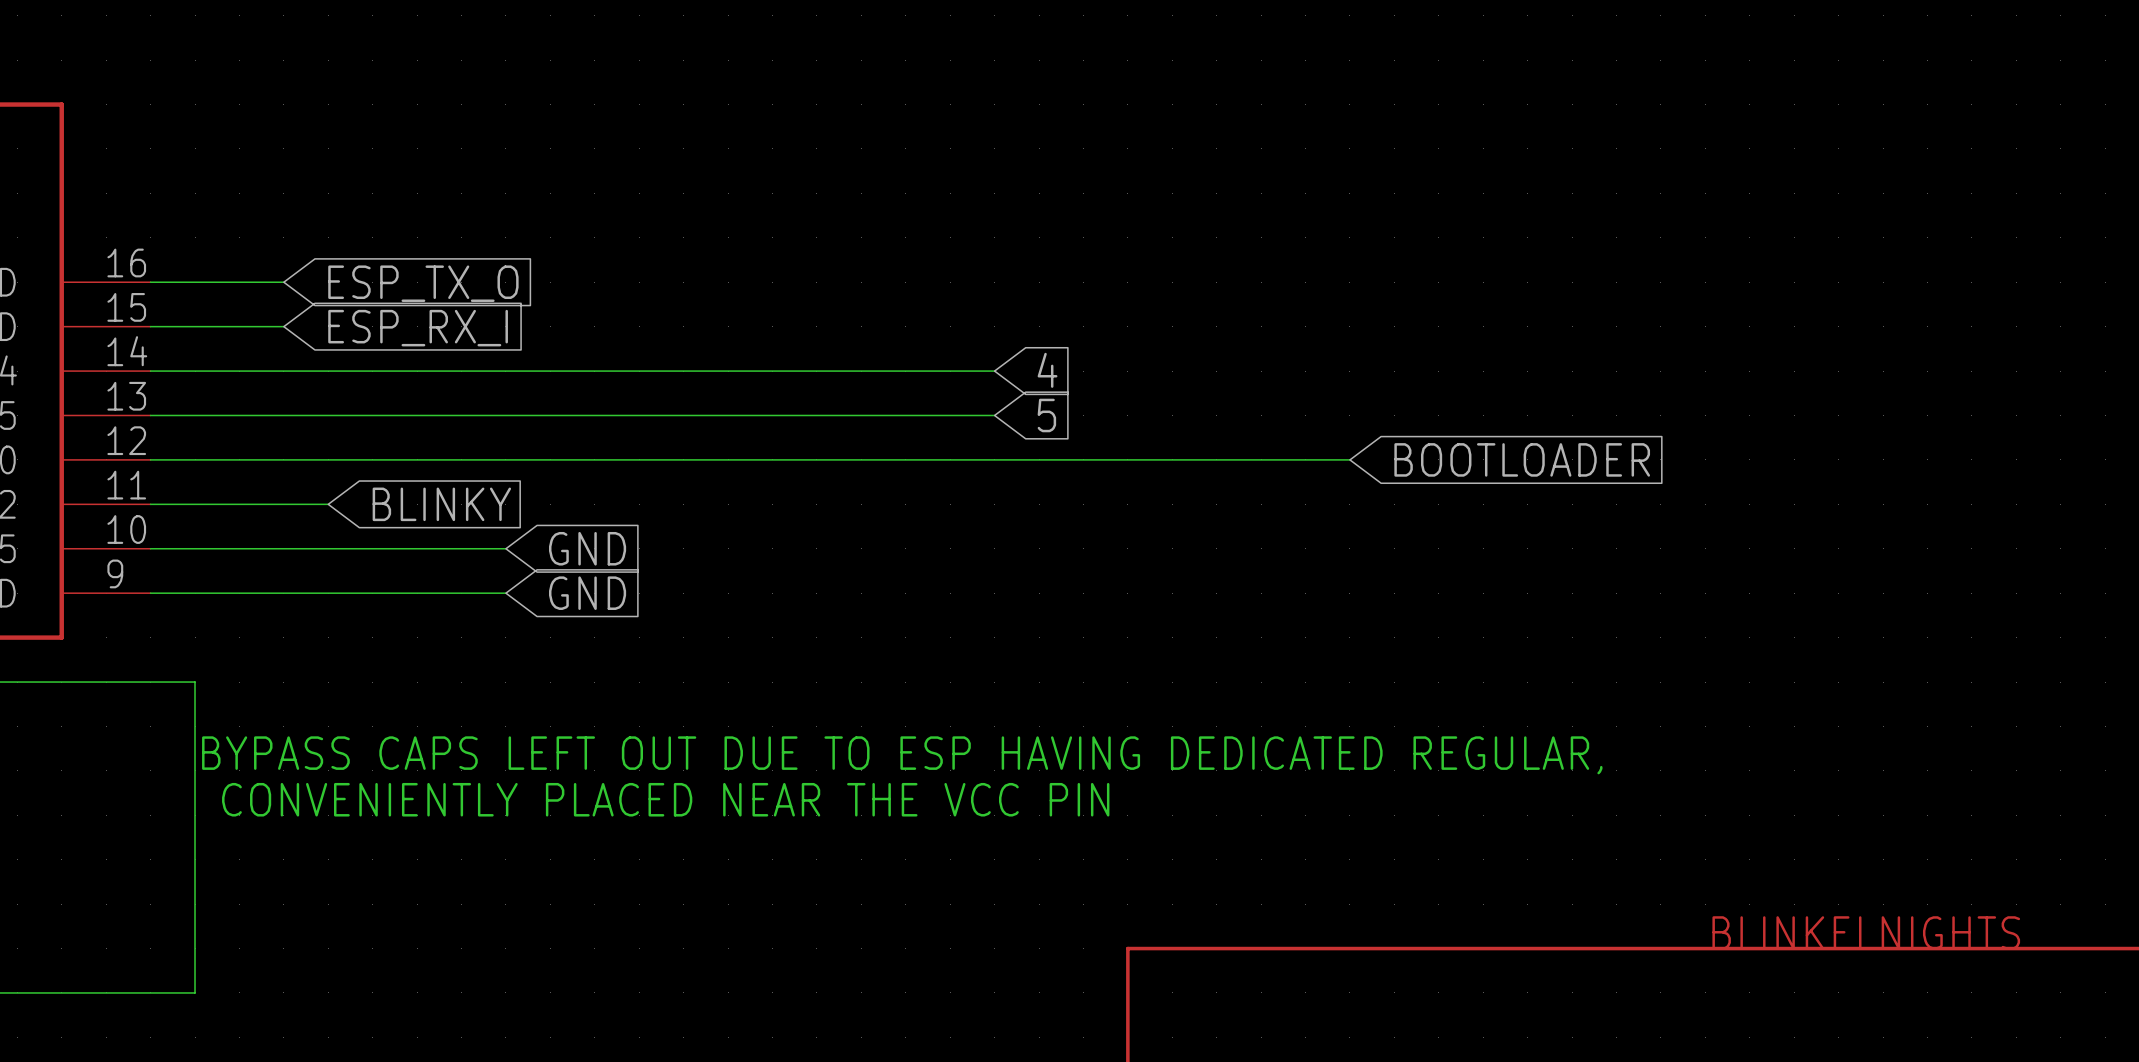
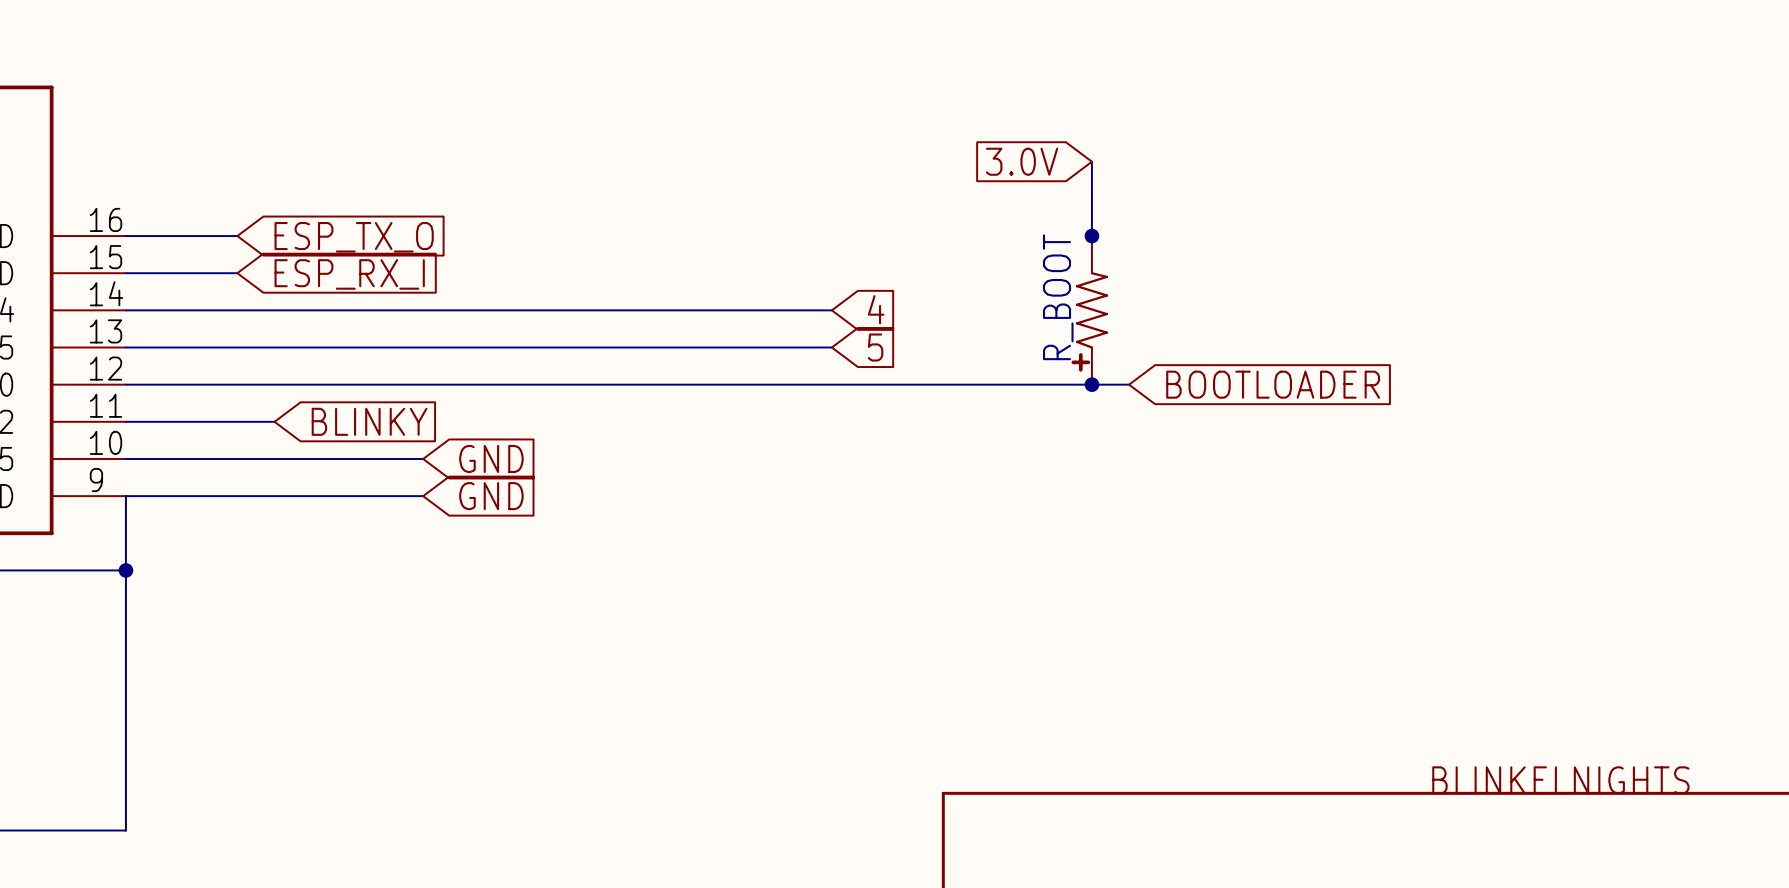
global label: none -> 3.0V (1022, 161)
wire: none -> (1091, 161) (1091, 236)
junction: none -> (1091, 236)
R_BOOT: none -> (1089, 310)
junction: none -> (1091, 384)
wire: (150, 682) (195, 682) (195, 992) (150, 992) -> (125, 496) (125, 830)
junction: none -> (125, 570)
text: BYPASS CAPS LEFT OUT DUE TO ESP HAVING DEDICATED REGULAR, (902, 755) -> none
text: CONVENIENTLY PLACED NEAR THE VCC PIN (665, 799) -> none

